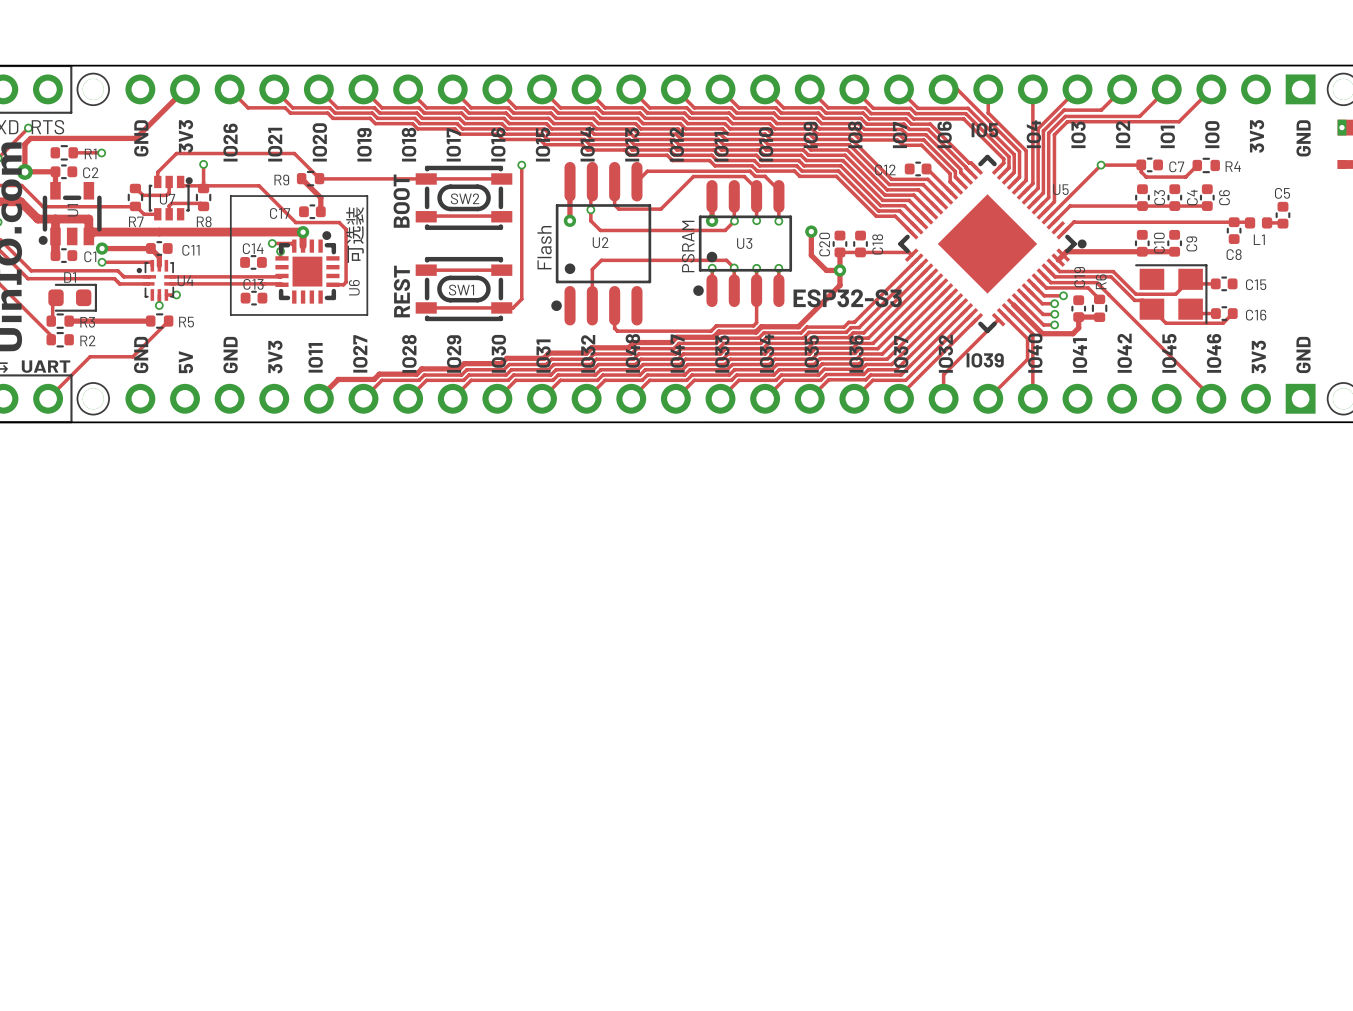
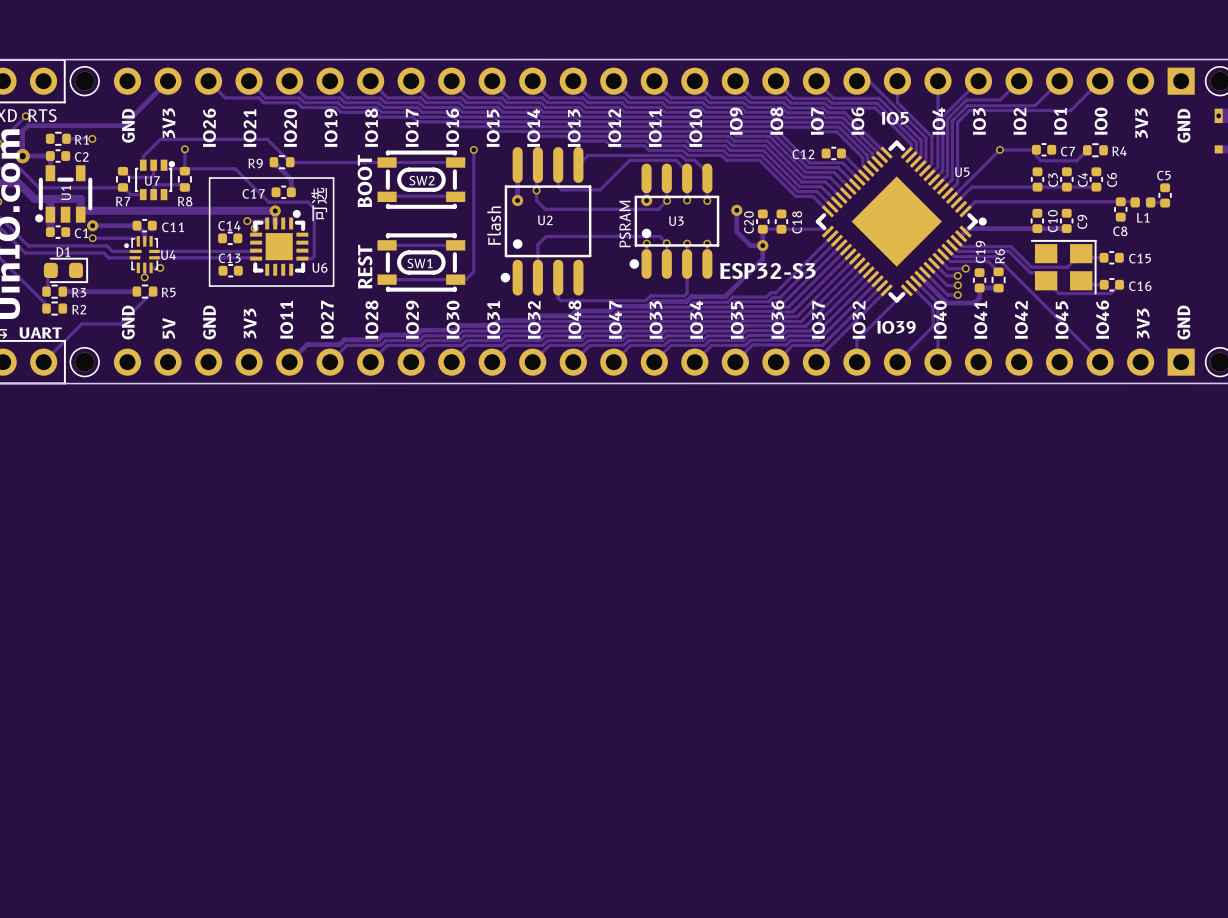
text: 可选装 (355, 234) -> 可选 (319, 204)
U6 name rotation: 0° (354, 287) -> 90° clockwise (319, 267)

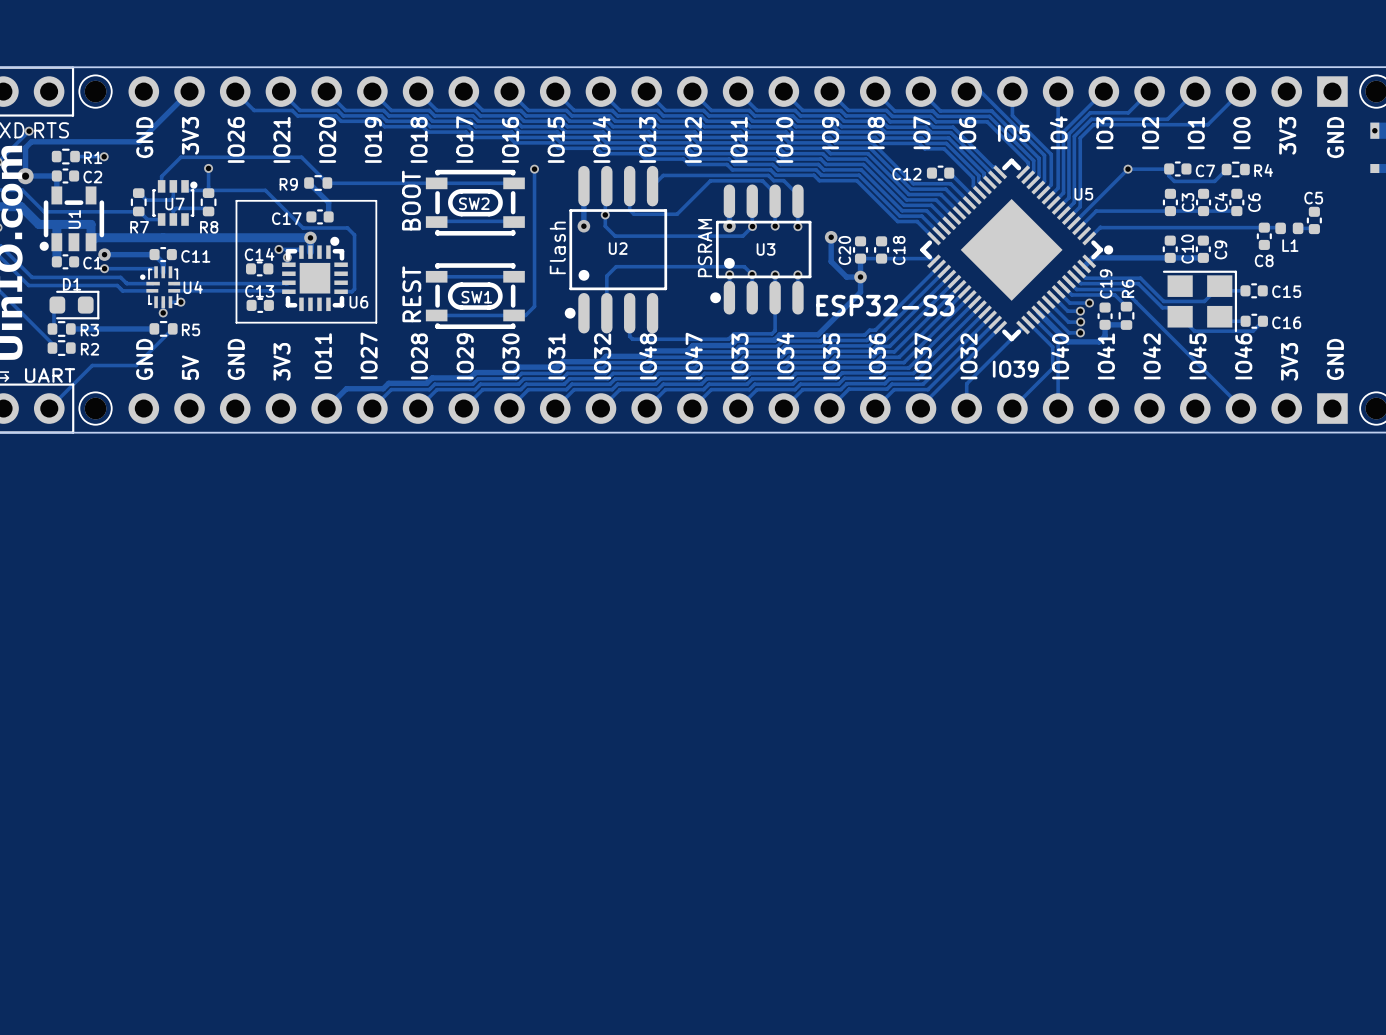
text: 可选 (319, 204) -> none

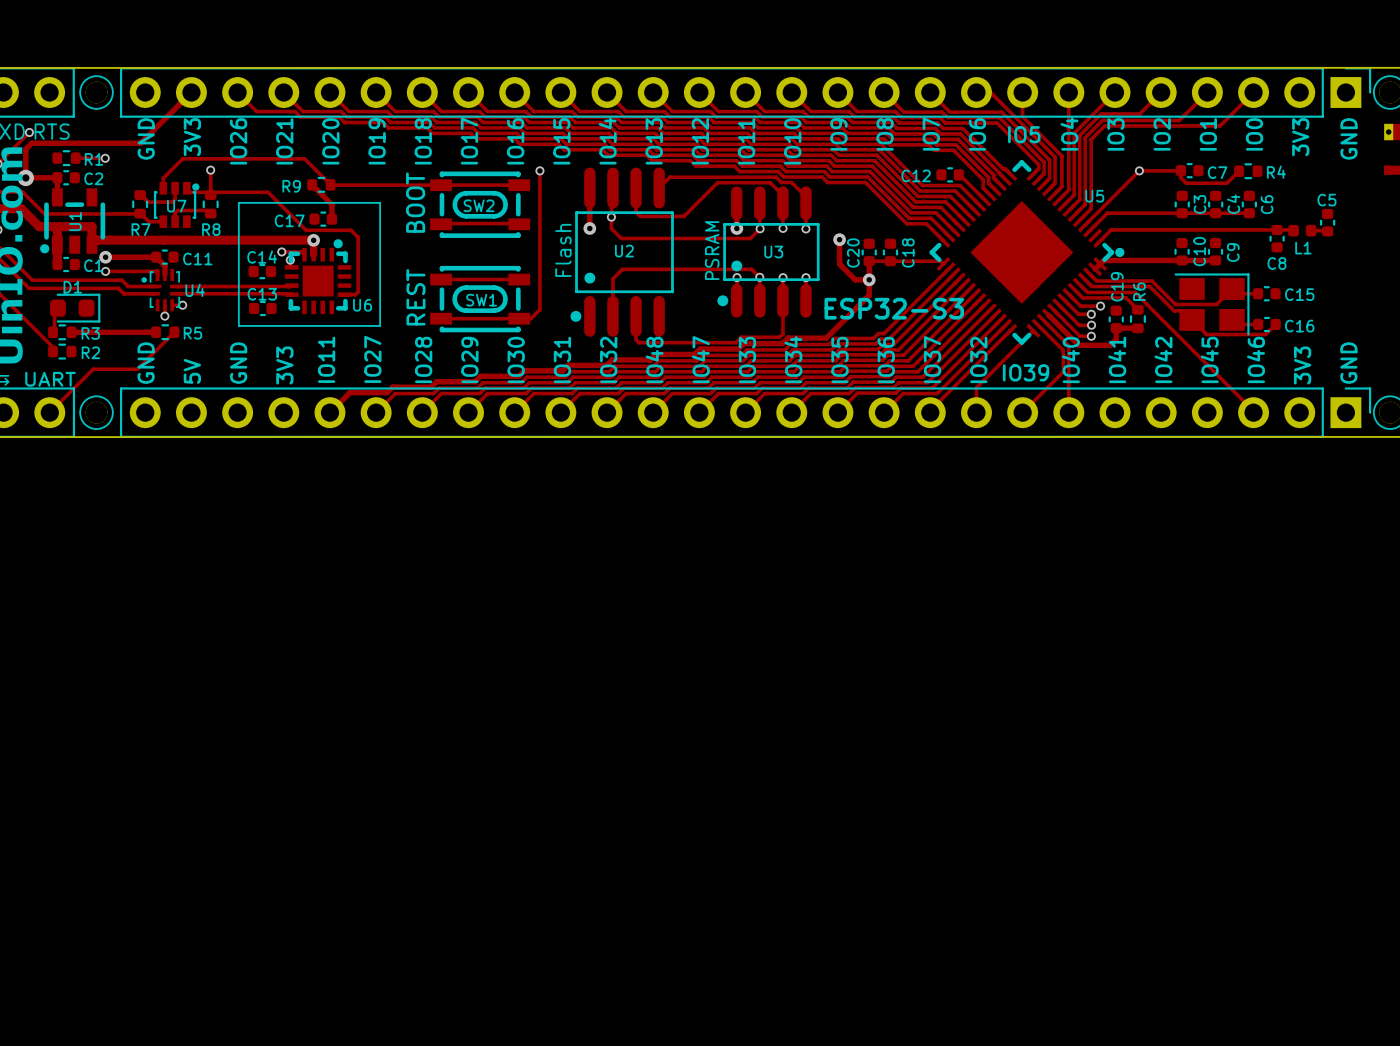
part side: bottom (738, 91) -> top (745, 92)
part side: bottom (738, 408) -> top (745, 412)

